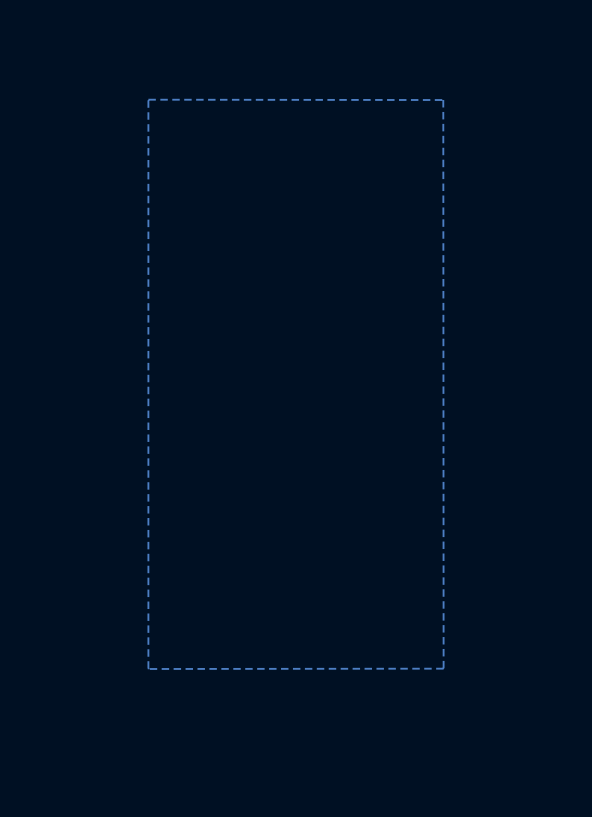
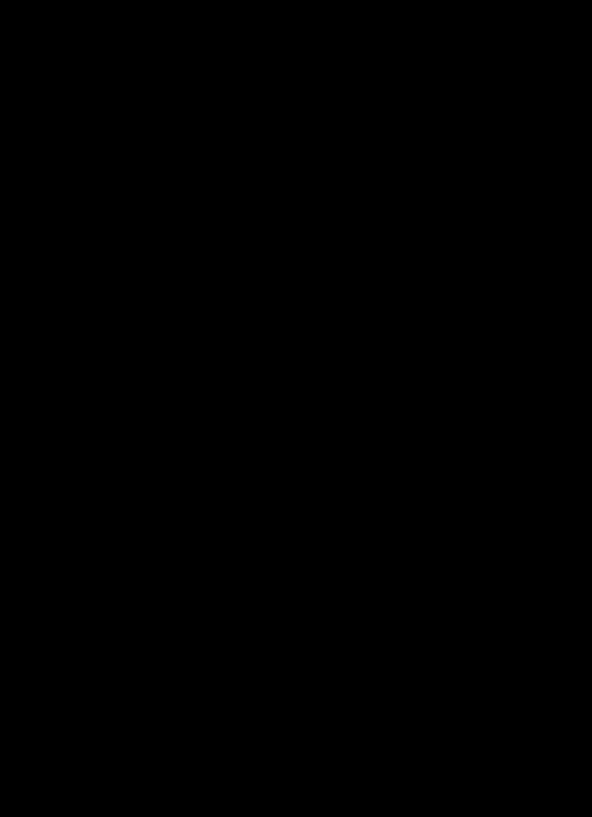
zone outline: (148, 668) (148, 99) (443, 100) (443, 668) (148, 668) -> none

